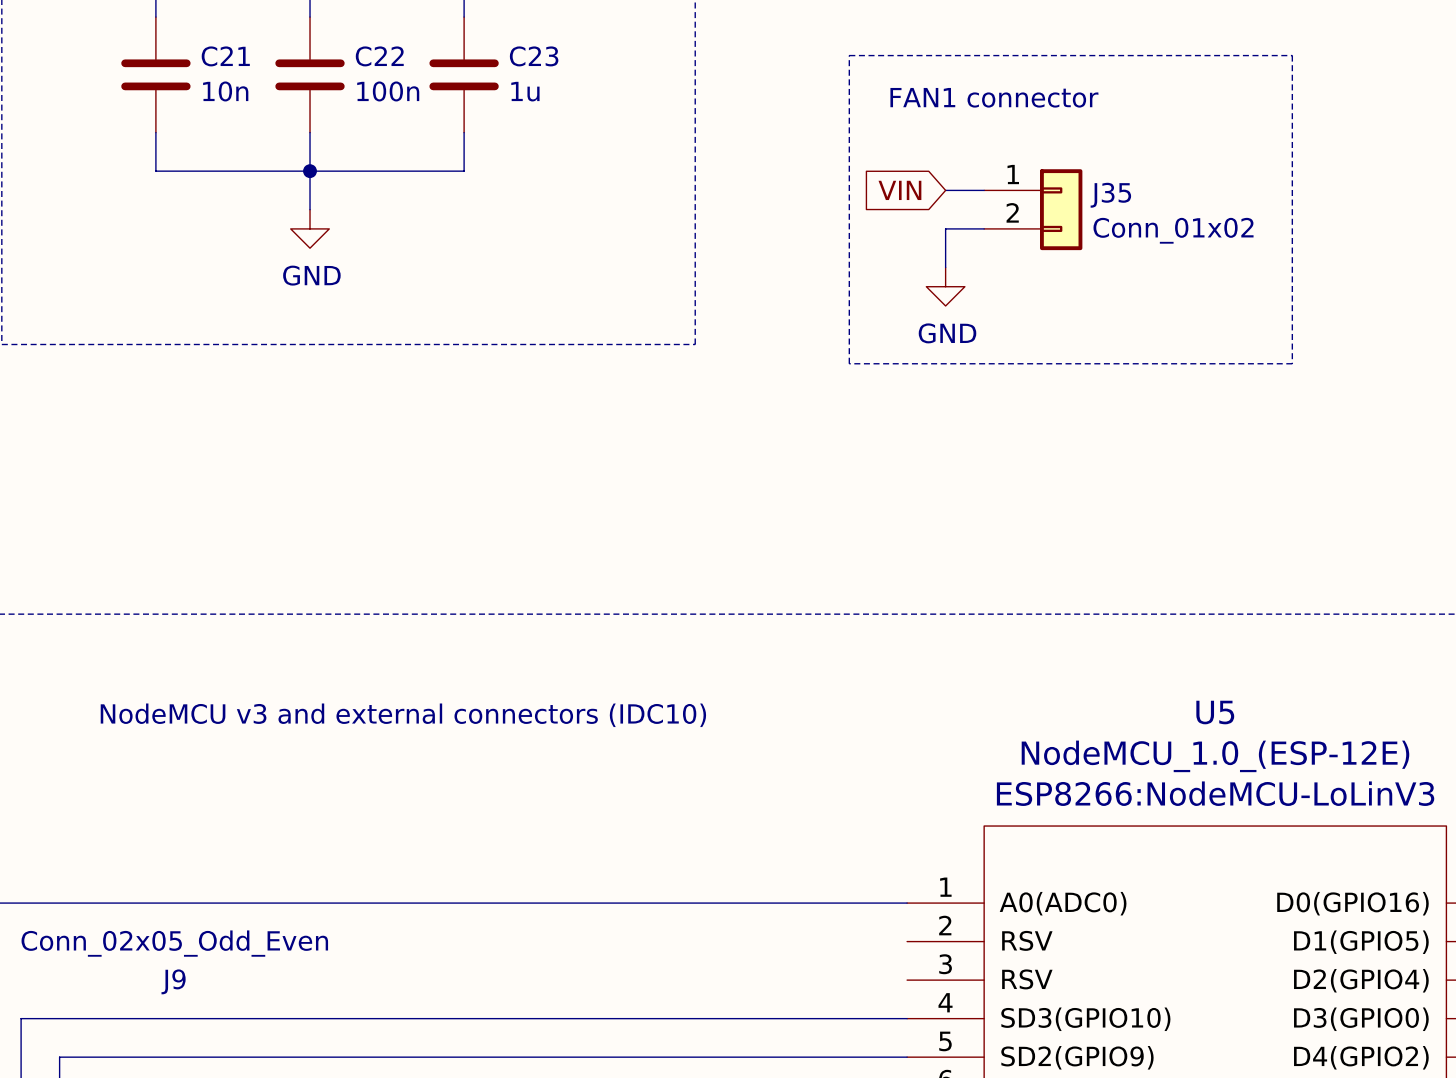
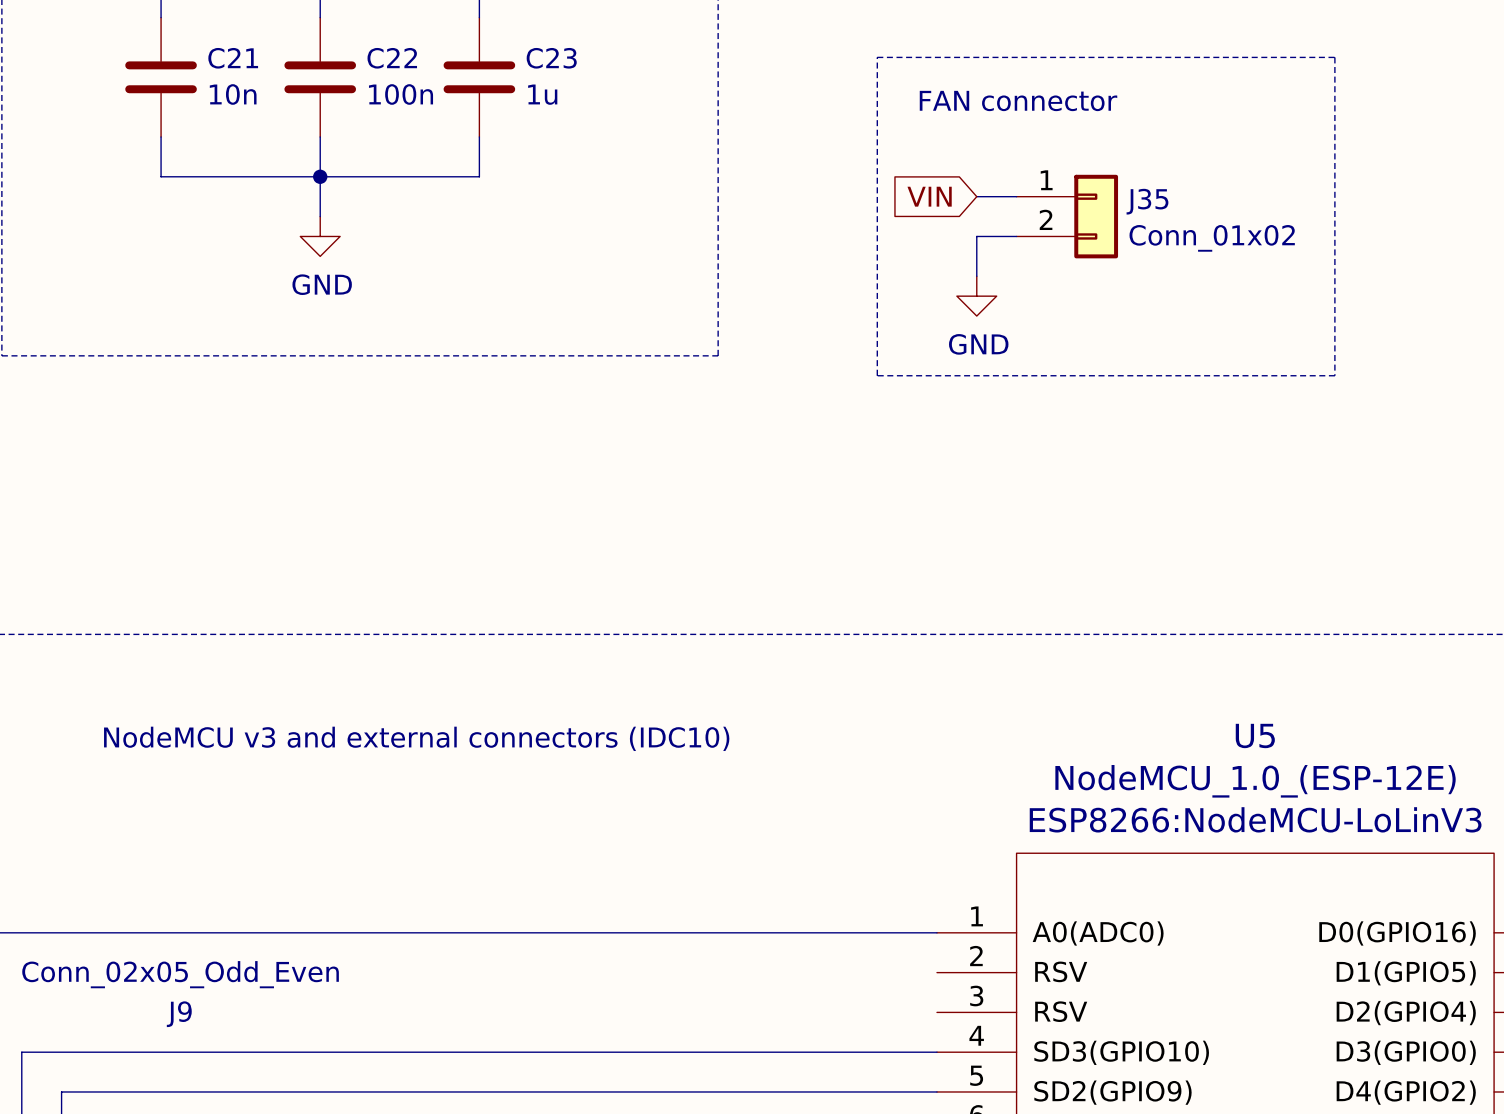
text: FAN1 connector (994, 97) -> FAN connector (1018, 100)

